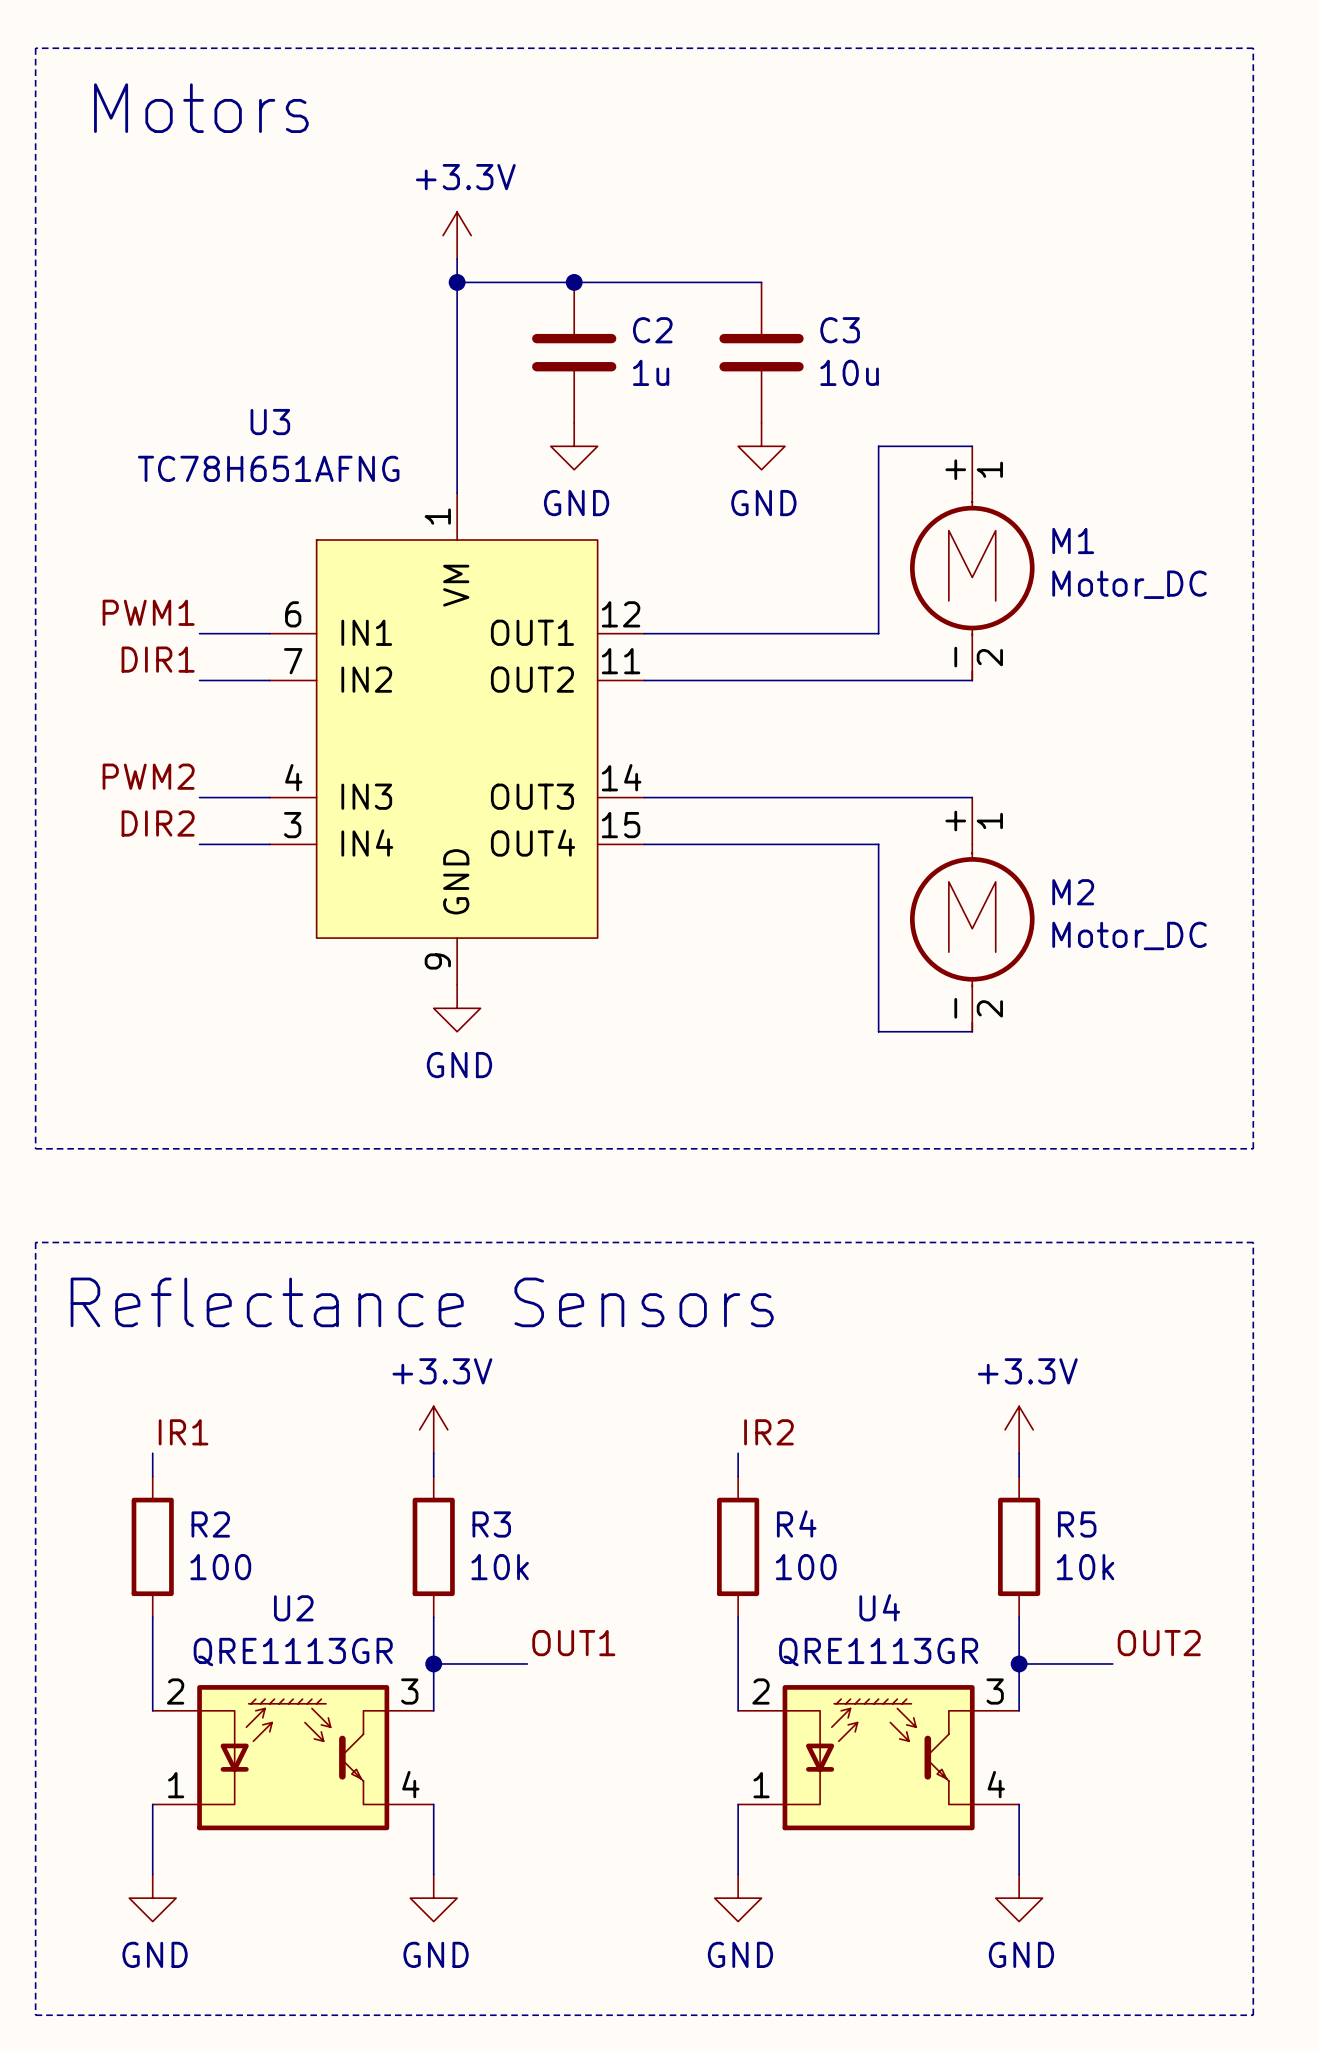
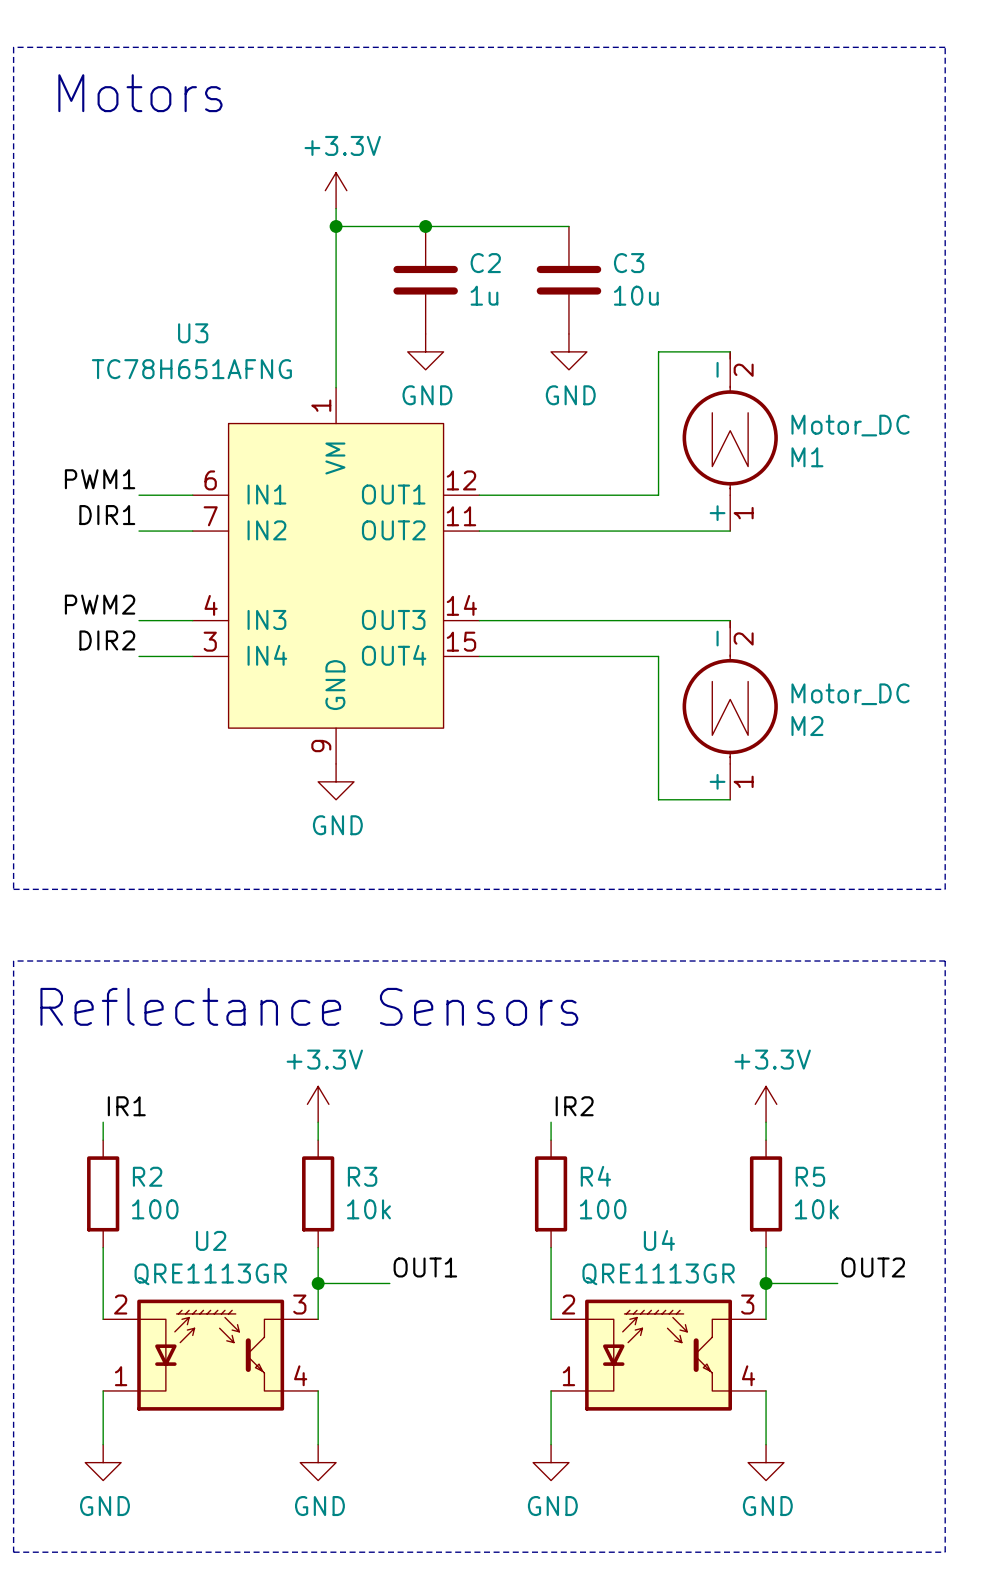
M1 name position: M1 (1073, 540) -> M1 (807, 457)
M1 value position: Motor_DC (1129, 584) -> Motor_DC (850, 425)
M1 rotation: 0° (972, 586) -> 180° (730, 423)
M2 name position: M2 (1073, 892) -> M2 (807, 726)
M2 value position: Motor_DC (1129, 935) -> Motor_DC (850, 694)
M2 rotation: 0° (972, 938) -> 180° (730, 692)

